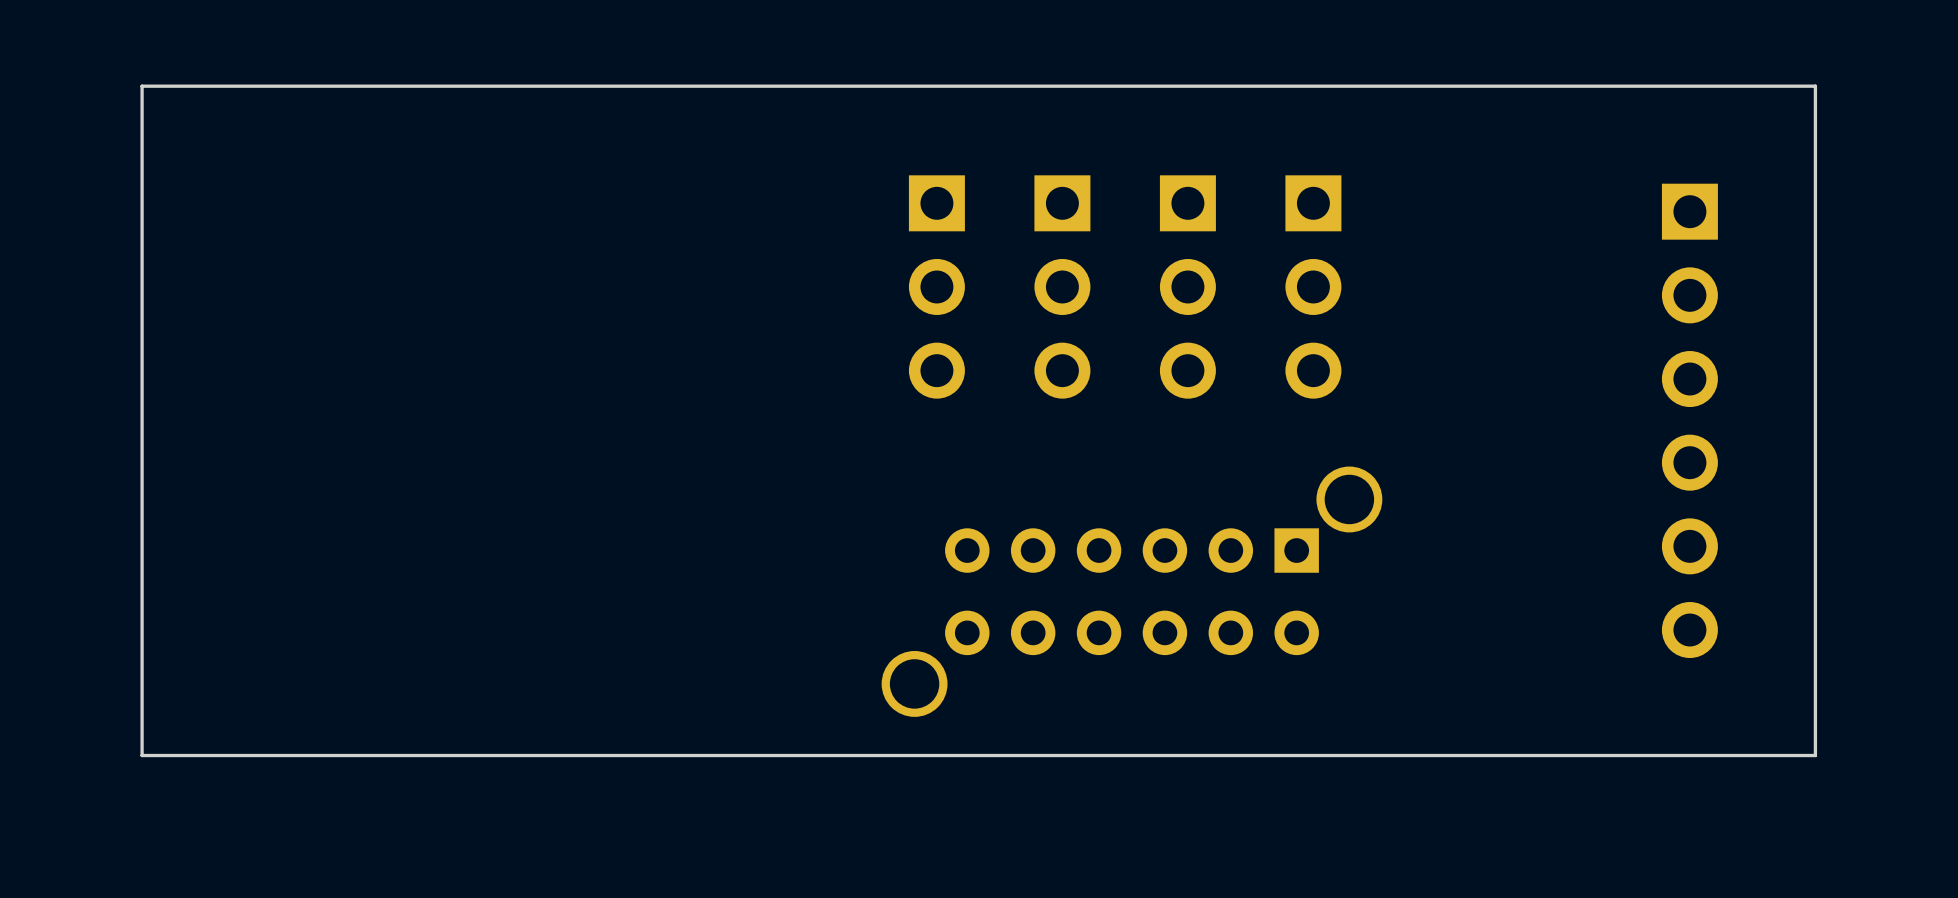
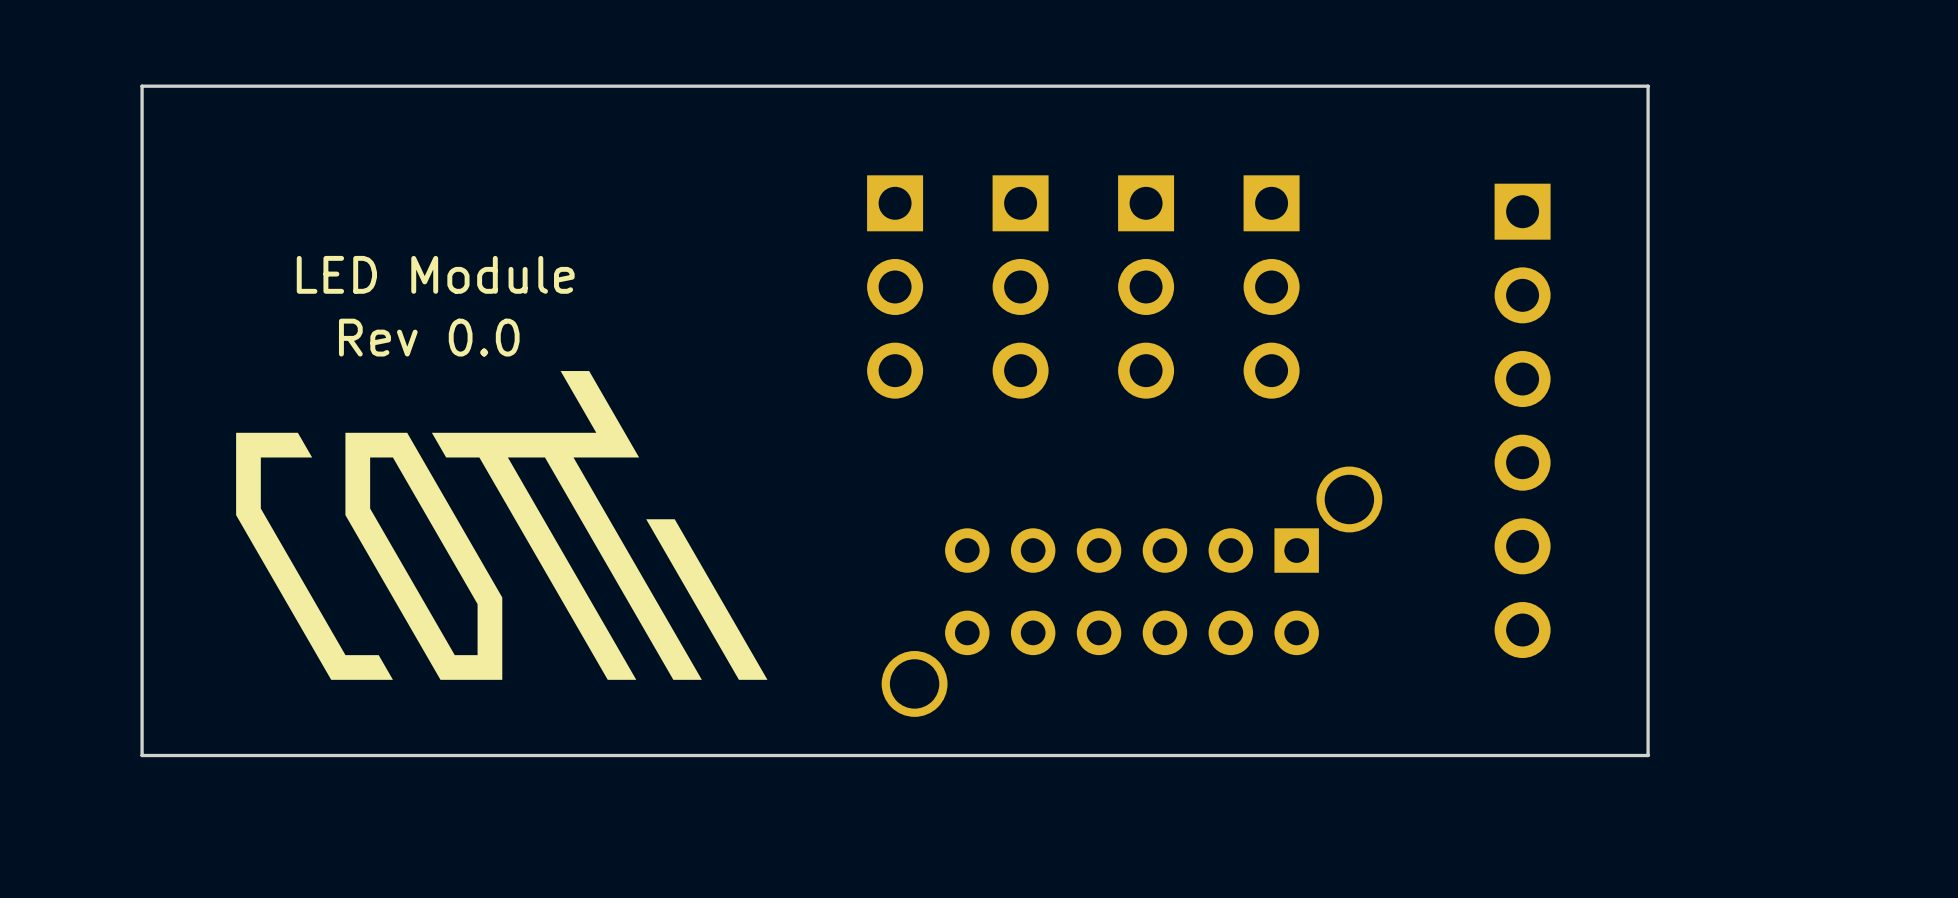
board edge: (1648, 86) (1815, 86) (1815, 755) (1648, 755) -> (1648, 86) (1648, 755)
text: none -> LED Module (435, 274)
part: none -> (895, 286)
part: (936, 286) -> none
part: none -> (1020, 286)
part: (1062, 286) -> none
part: none -> (1146, 286)
part: (1187, 286) -> none
part: none -> (1271, 286)
part: (1313, 286) -> none
text: none -> Rev 0.0 (429, 337)
drawing: none -> [236, 371, 768, 680]
part position: (1689, 420) -> (1522, 420)

